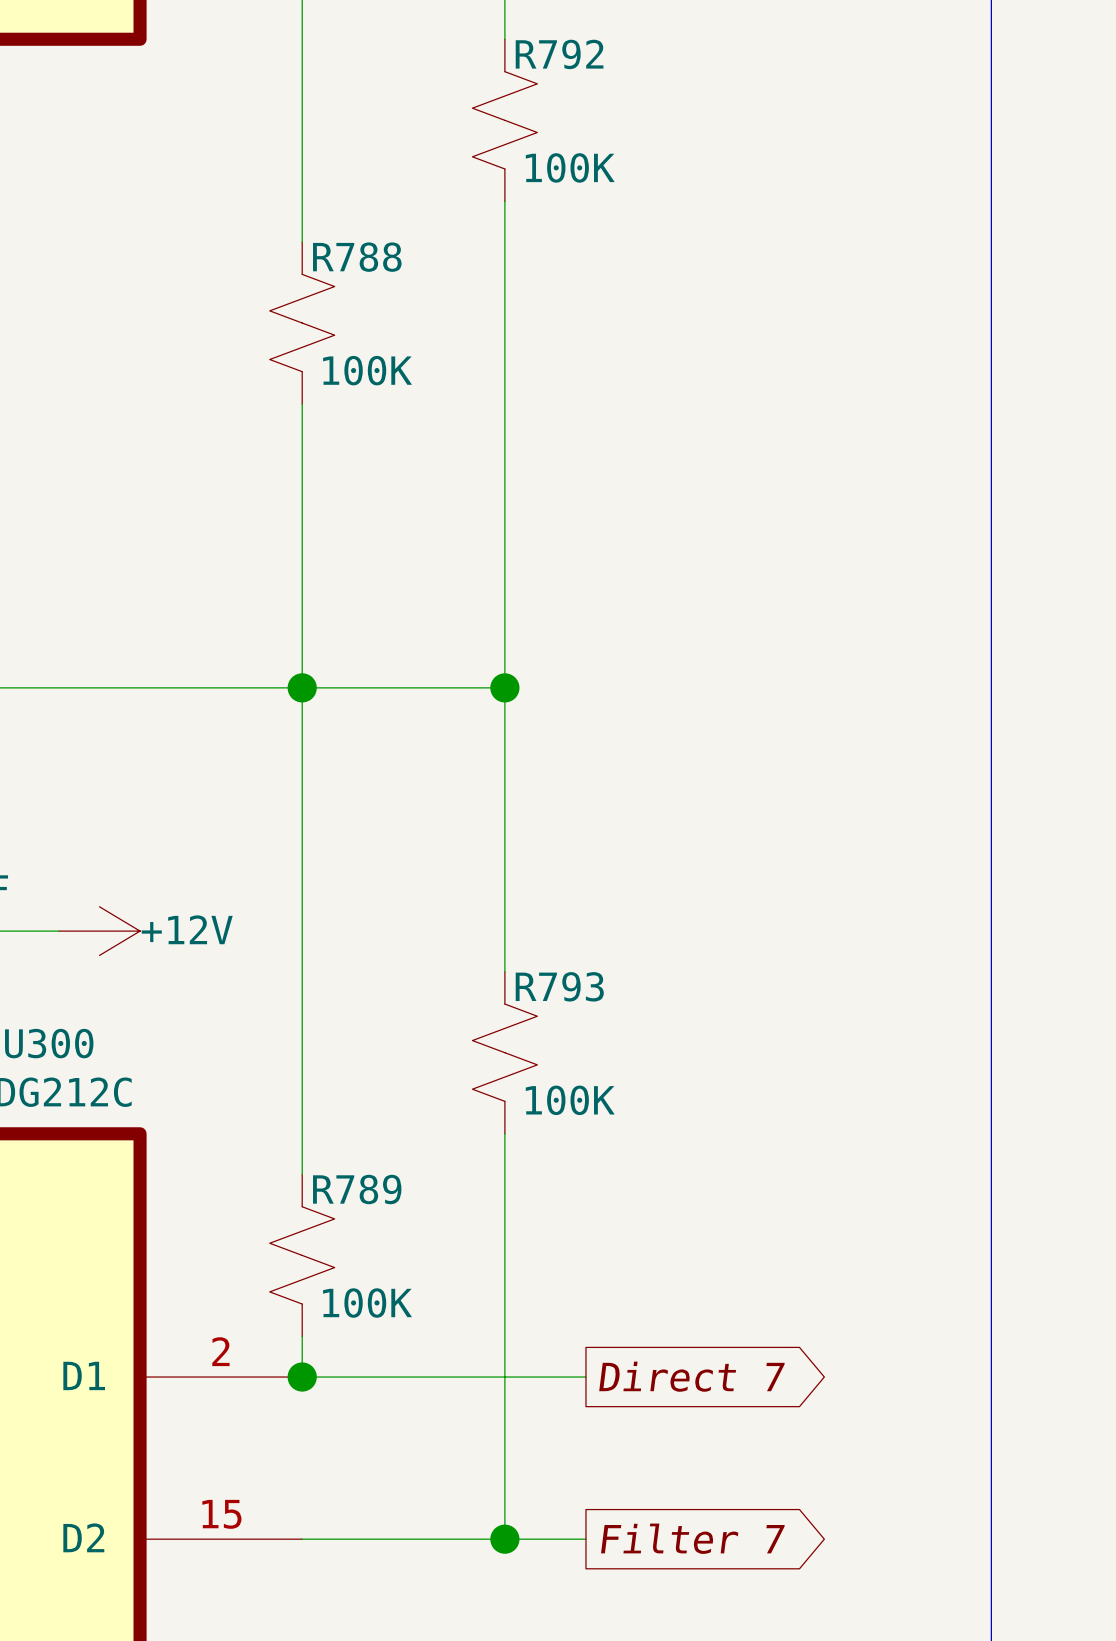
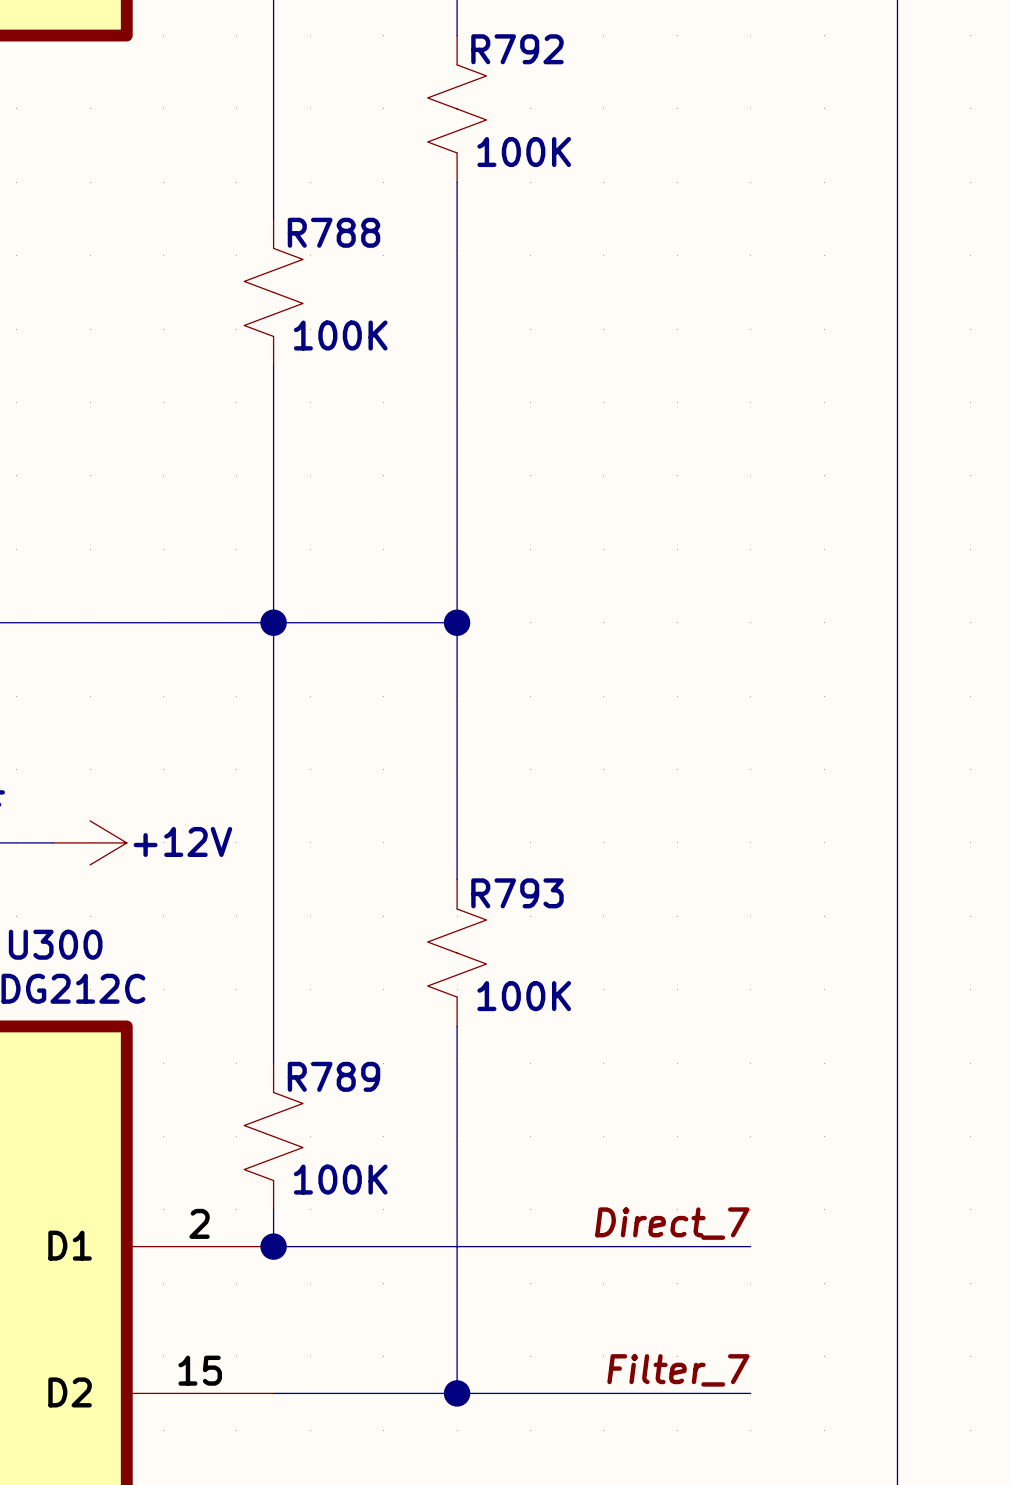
label: none -> Direct_7 (672, 1223)
global label: Direct 7 (691, 1376) -> none
wire: none -> (530, 1246) (750, 1246)
label: none -> Filter_7 (678, 1370)
global label: Filter 7 (692, 1538) -> none
wire: none -> (530, 1393) (750, 1393)

